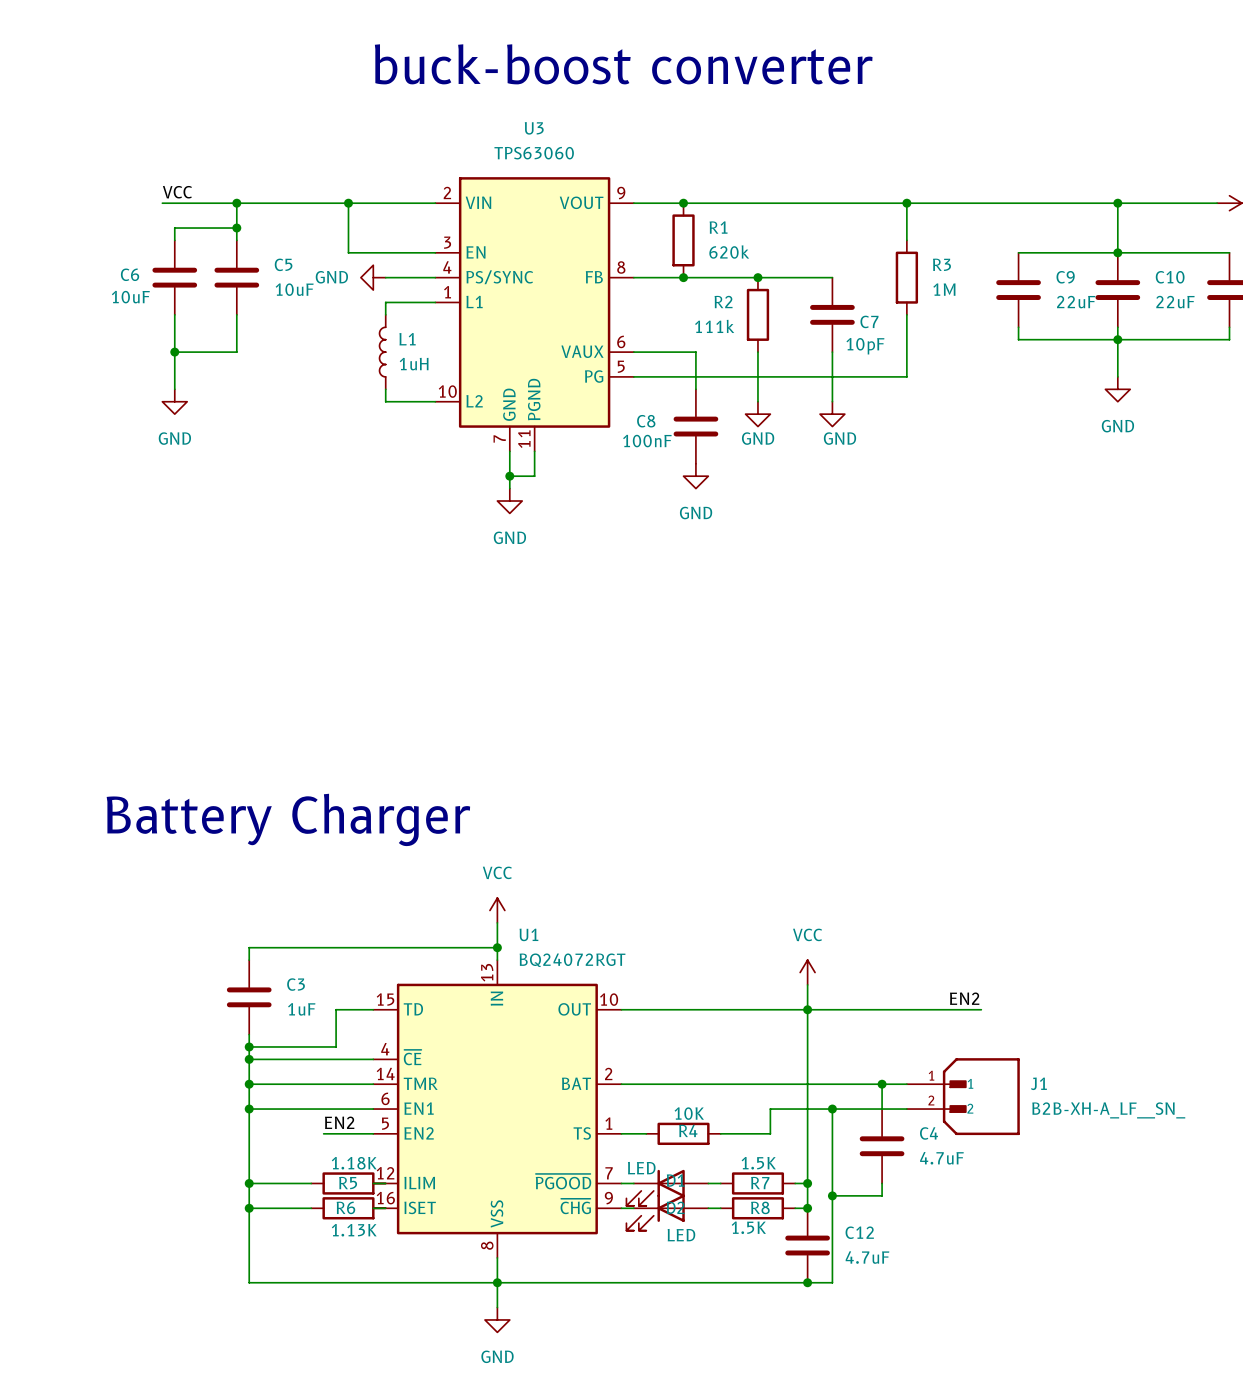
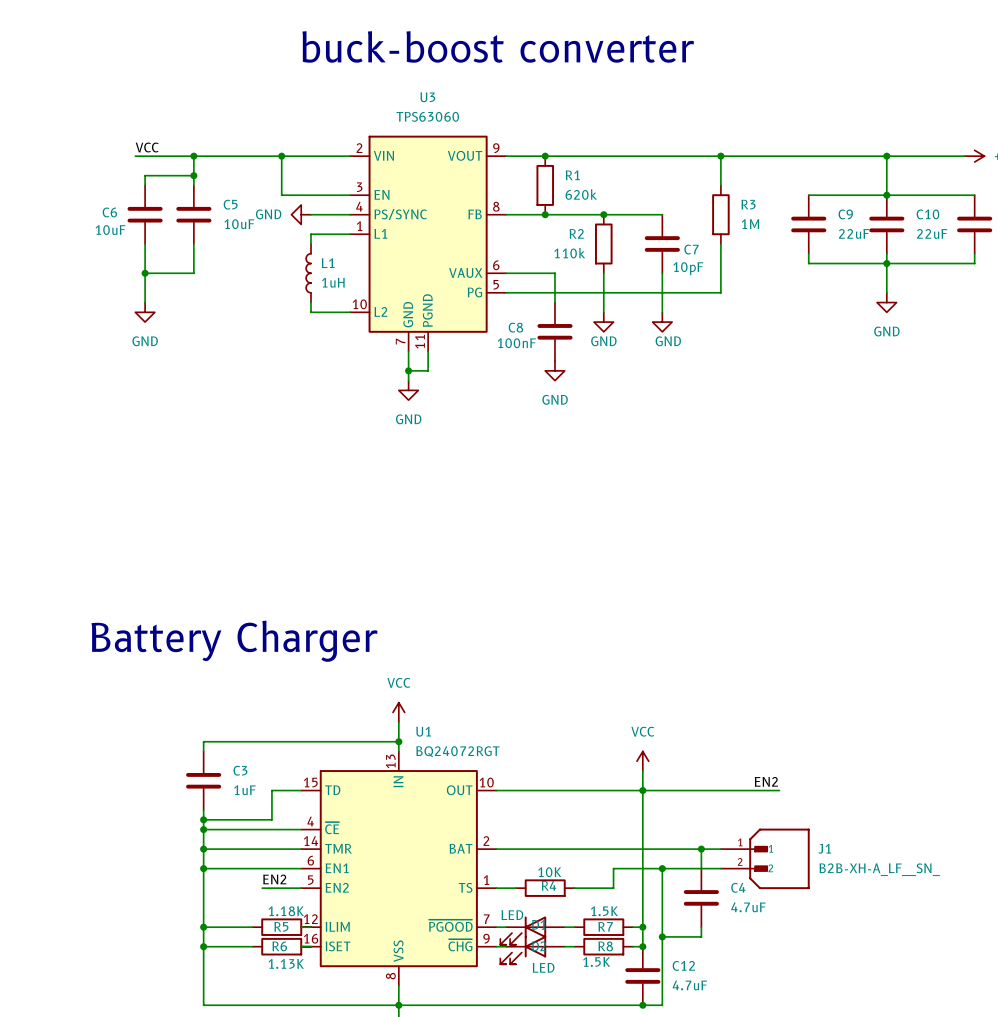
R2 value: 111k (714, 326) -> 110k (569, 253)

